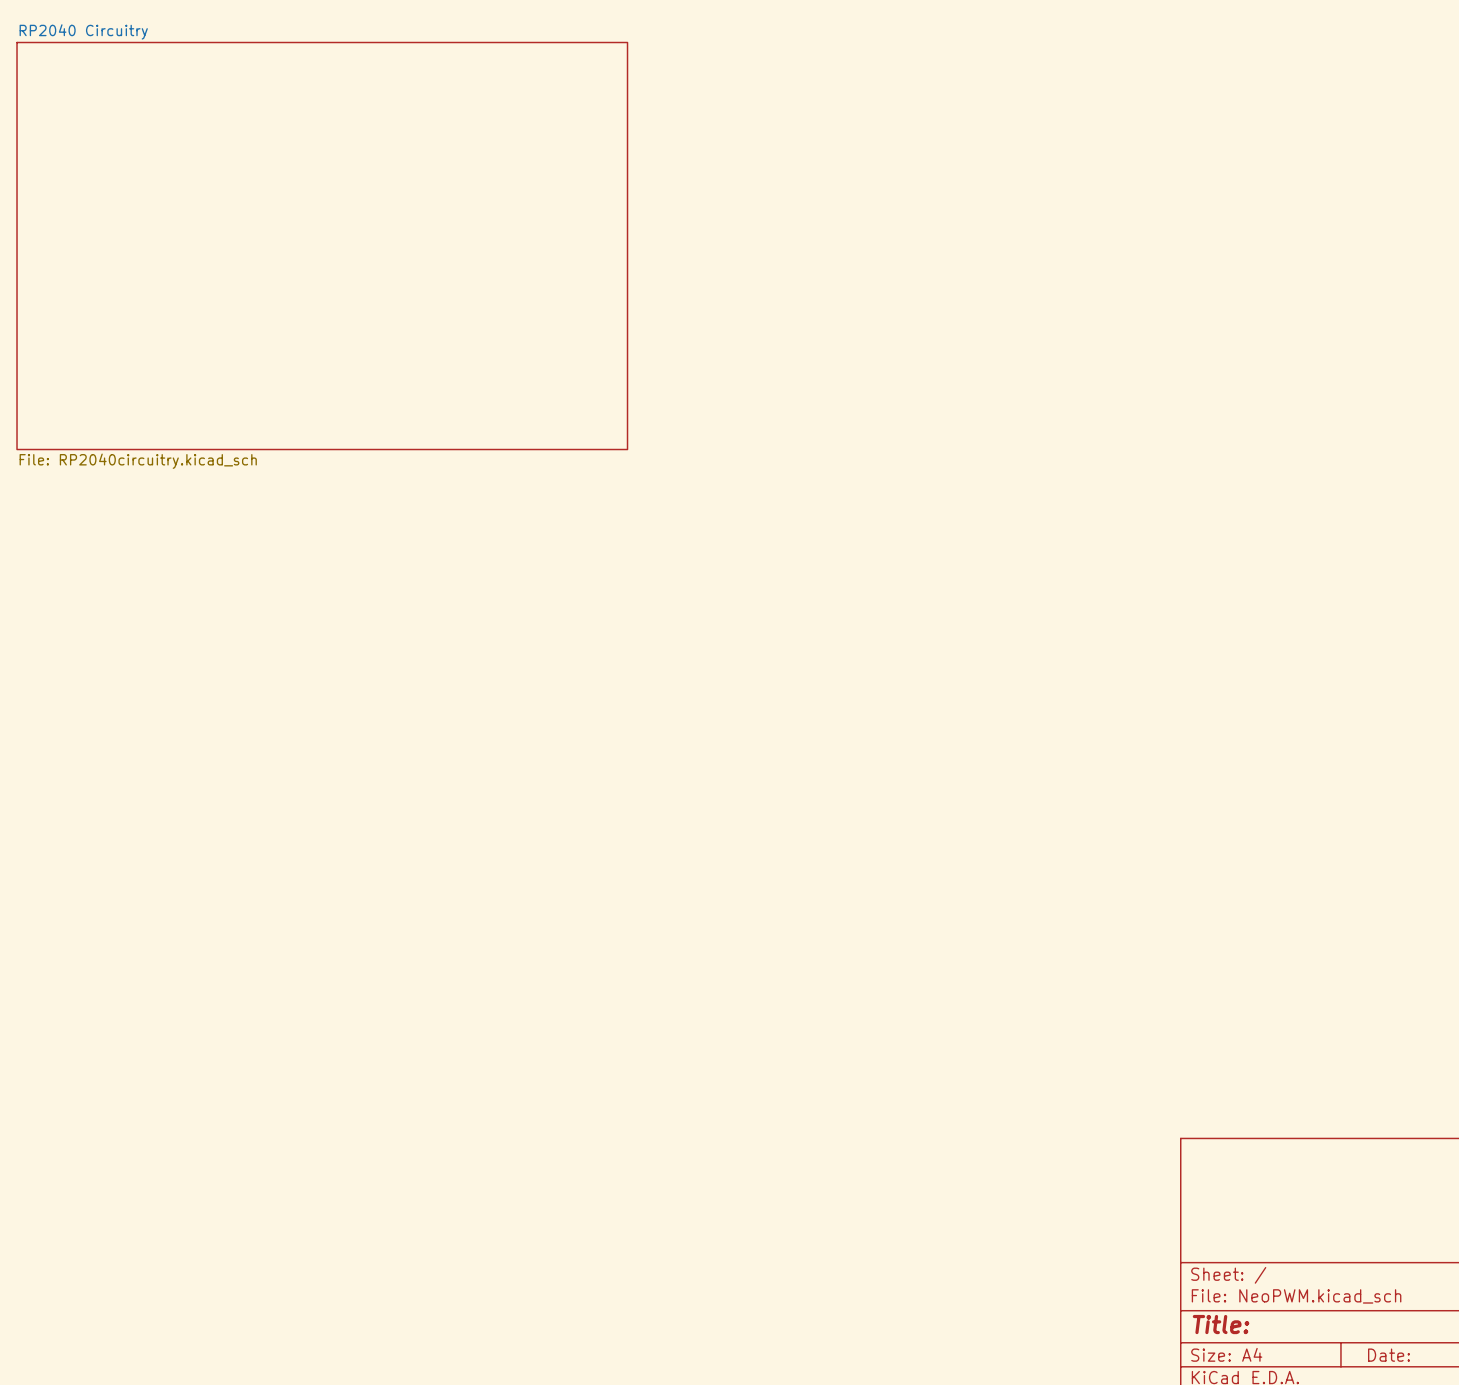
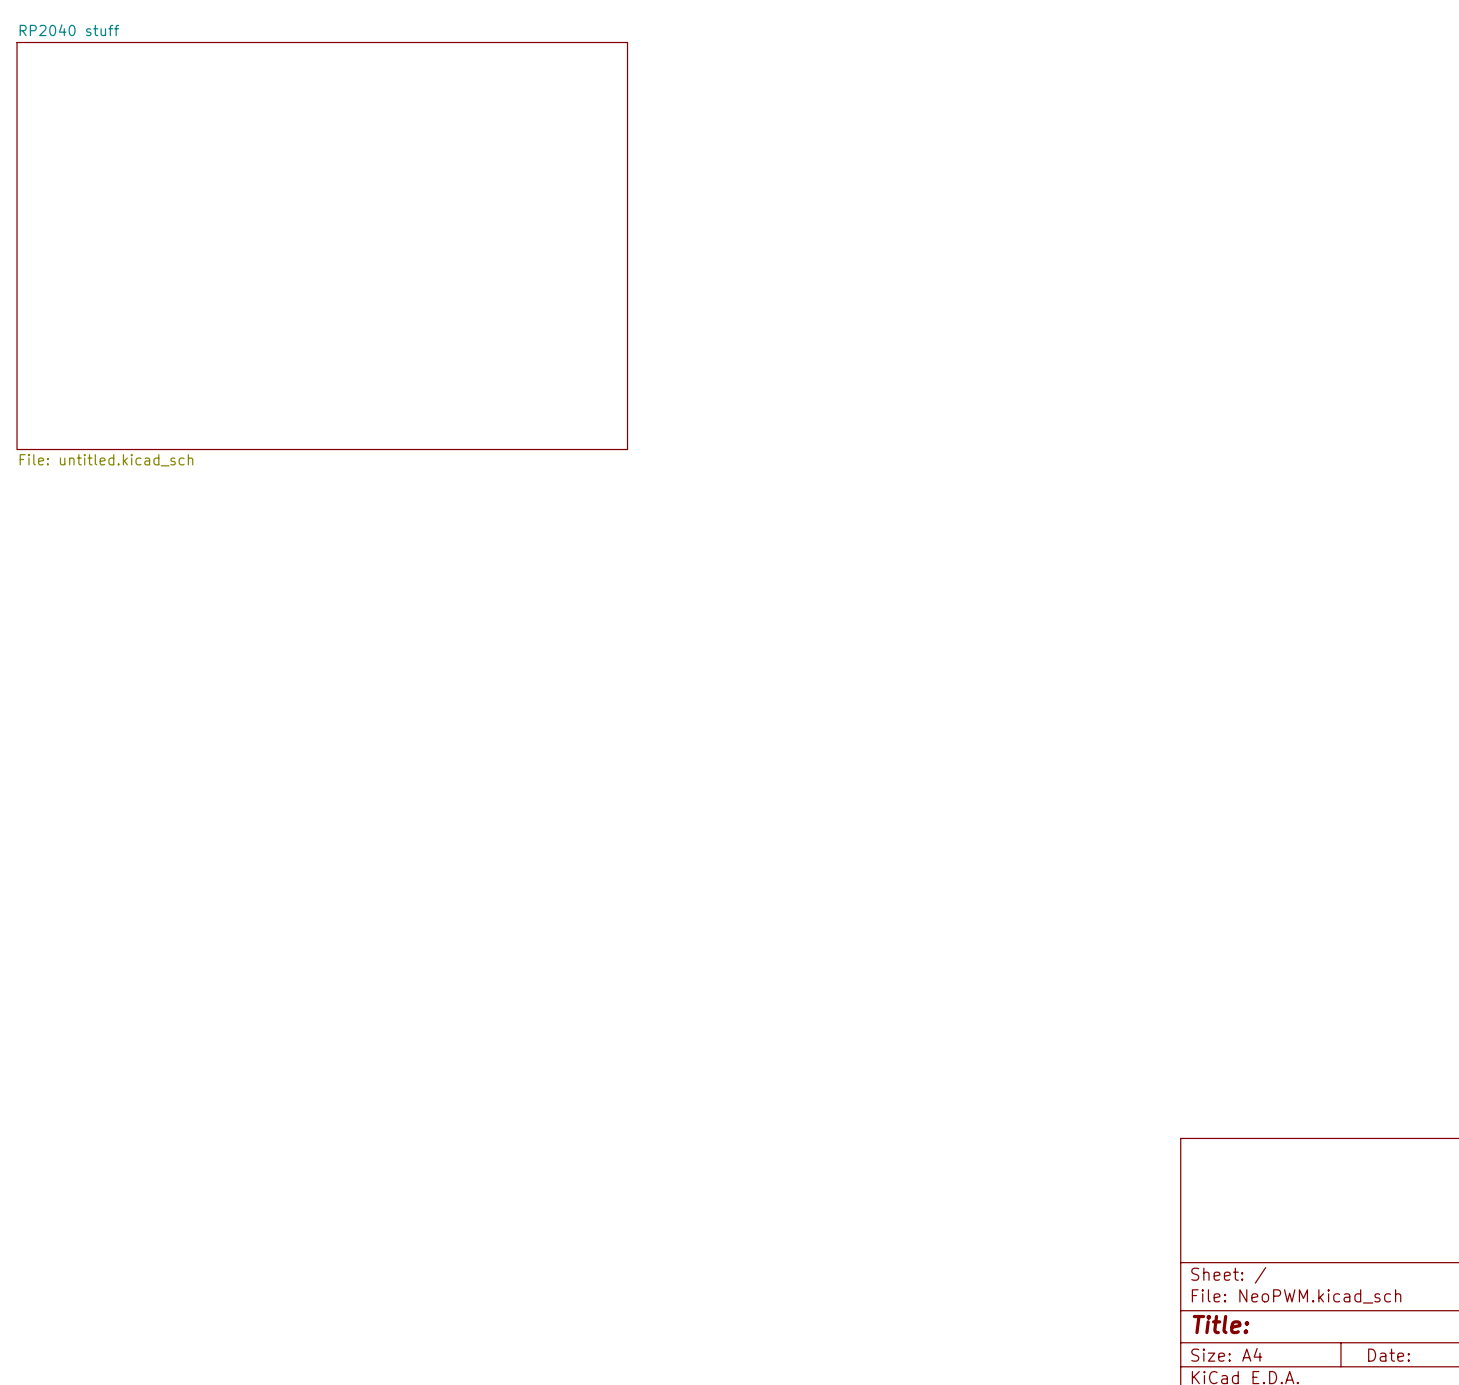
sheet RP2040 Circuitry name: RP2040 Circuitry (83, 31) -> RP2040 stuff (69, 30)
sheet RP2040 Circuitry value: File: RP2040circuitry.kicad_sch (138, 461) -> File: untitled.kicad_sch (106, 460)

